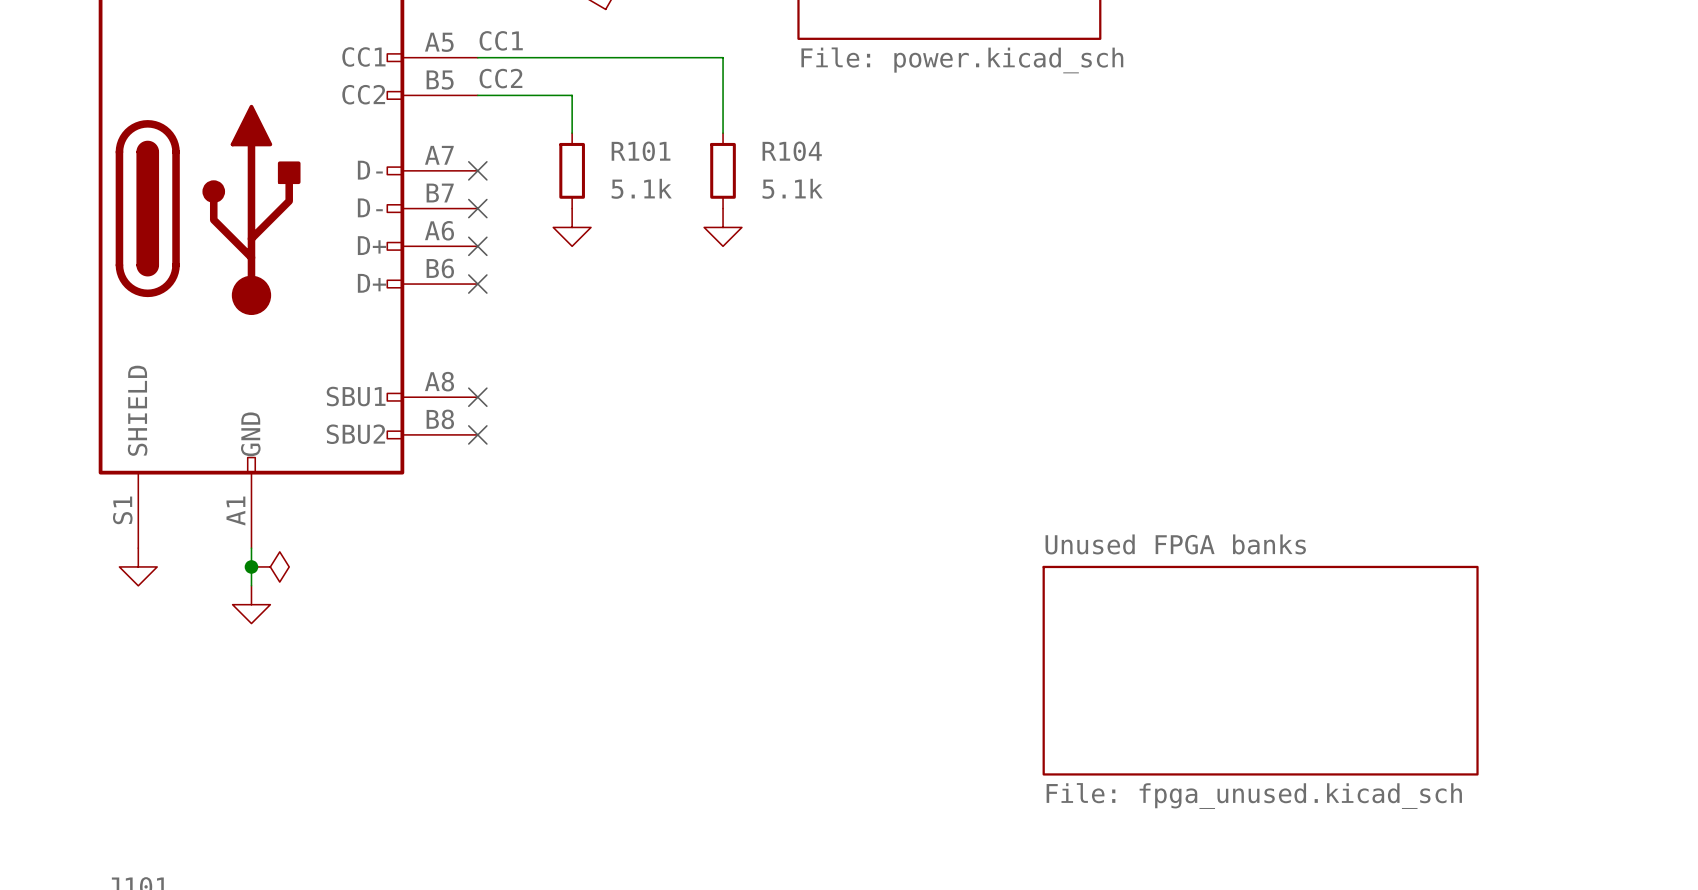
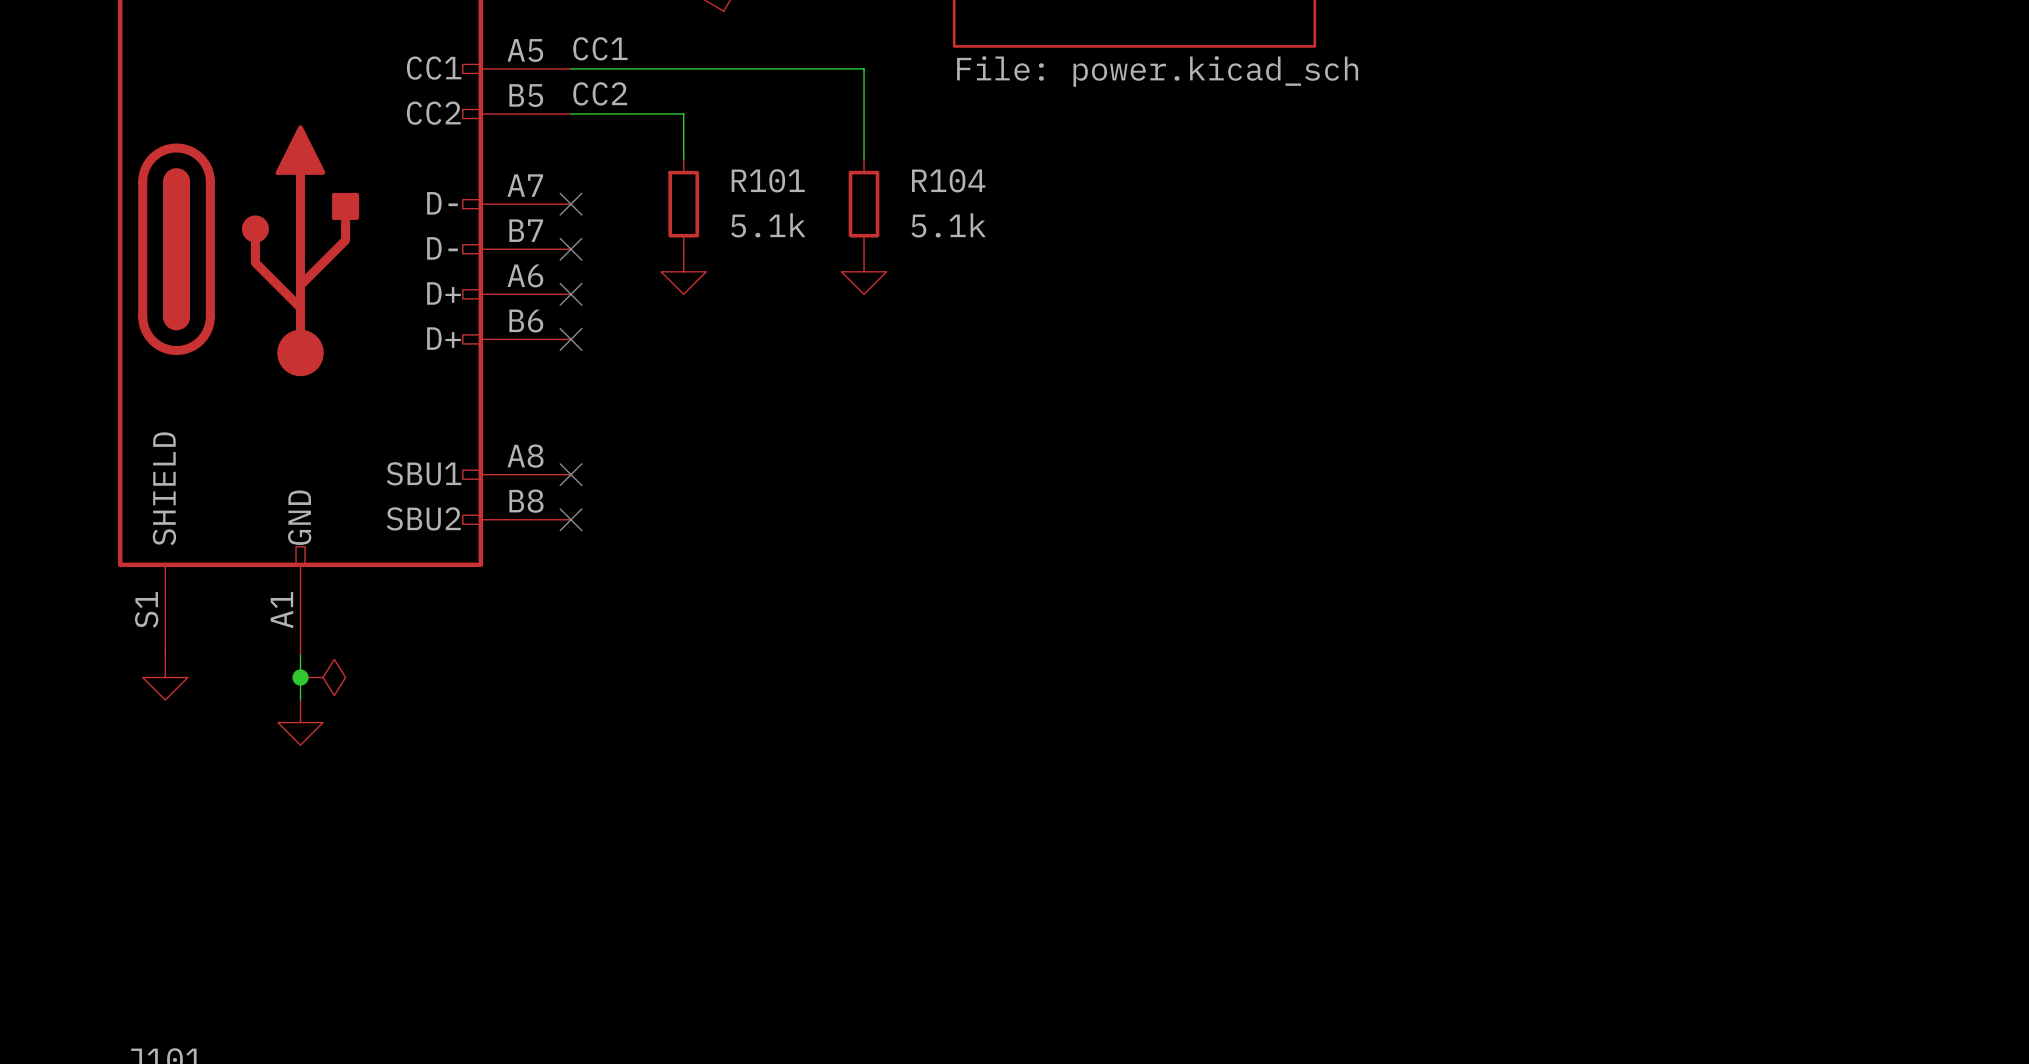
sheet Unused FPGA banks: File: fpga_unused.kicad_sch (1260, 670) -> none

